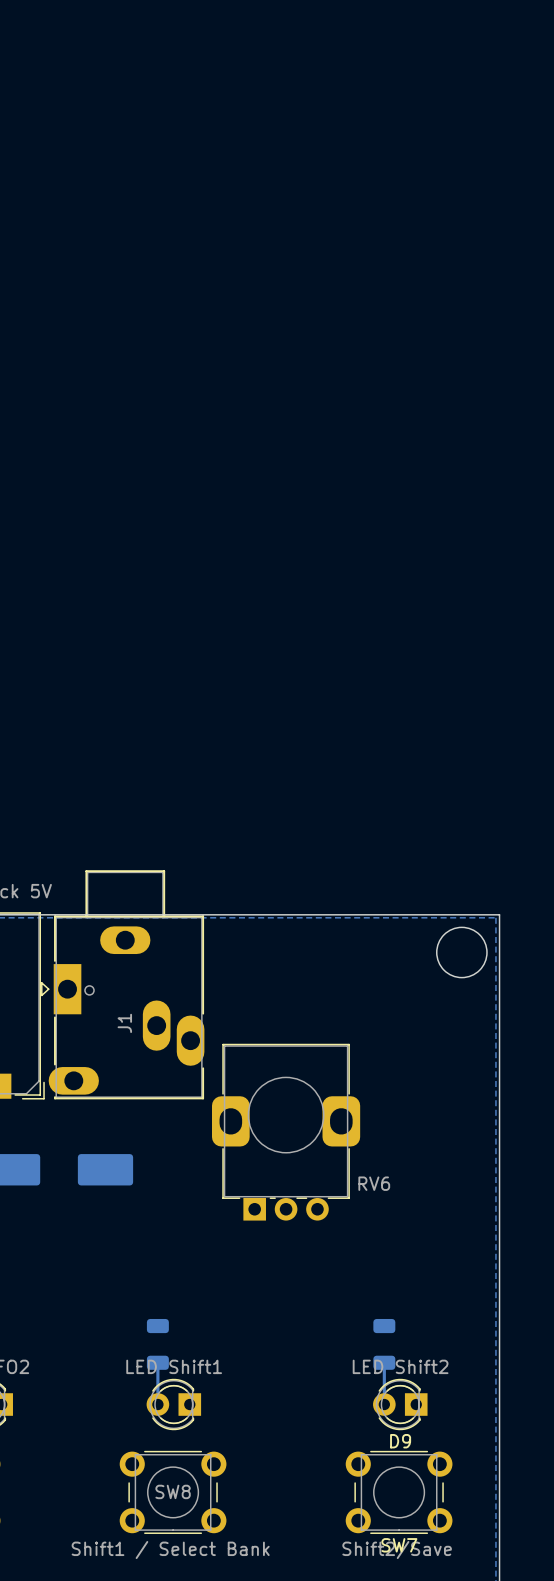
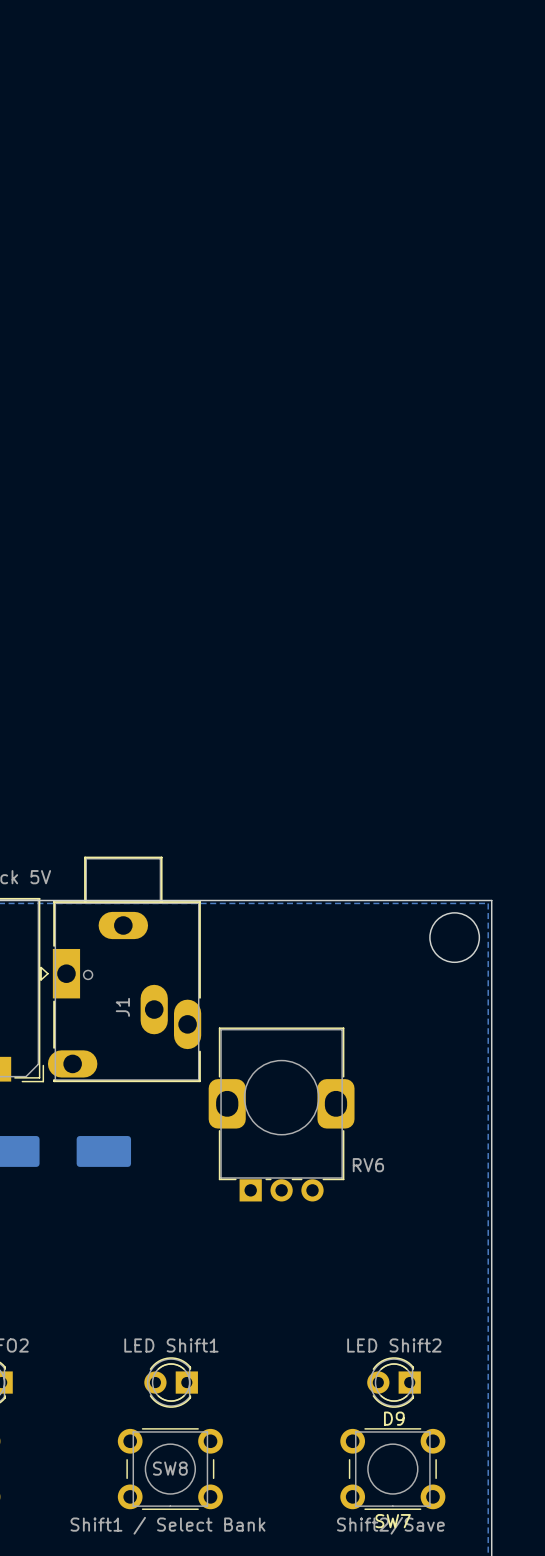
part: (157, 1344) -> none
part: (384, 1344) -> none
bottom track: (157, 1362) (157, 1404) -> none
bottom track: (384, 1362) (384, 1404) -> none

